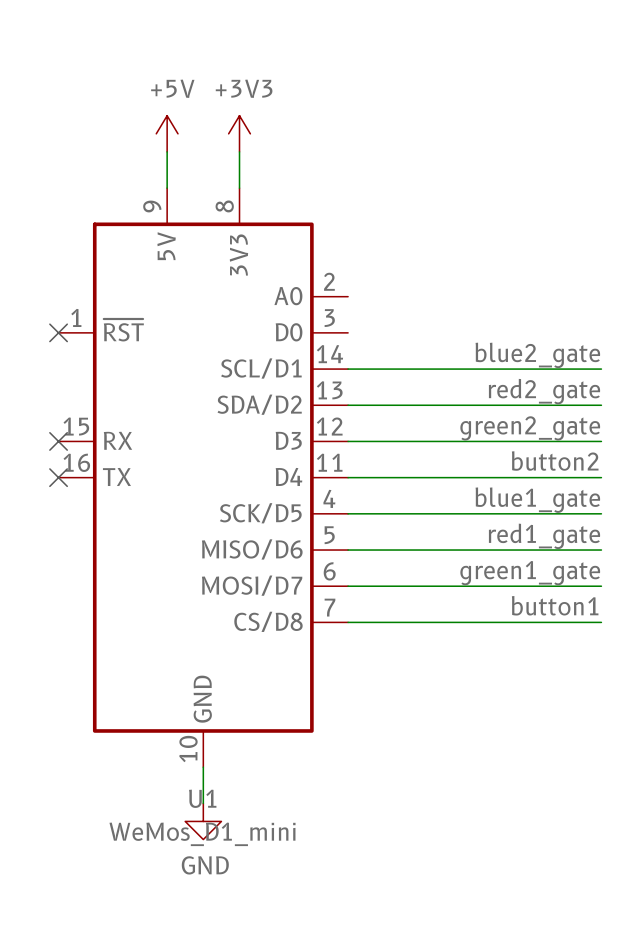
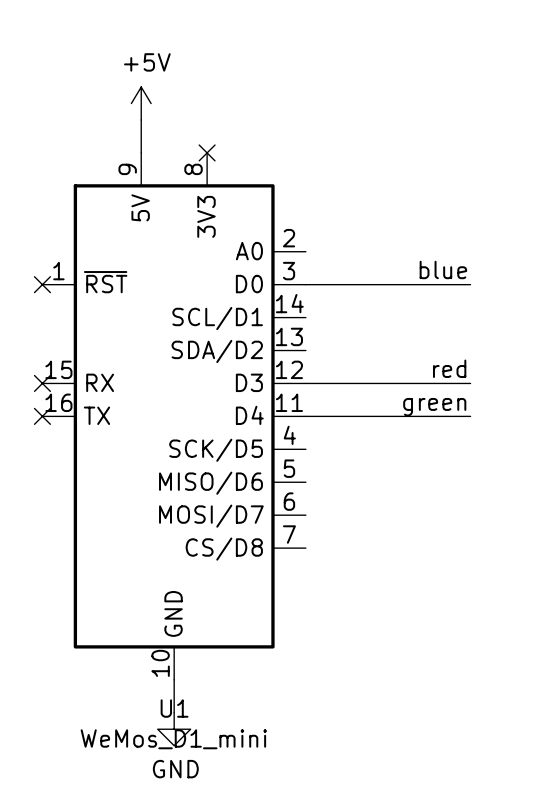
power symbol: +3V3 (239, 133) -> none
wire: (239, 151) (239, 188) -> none
no-connect mark: none -> (207, 152)
label: none -> blue (443, 269)
wire: none -> (305, 284) (470, 284)
label: blue2_gate (537, 355) -> none
wire: (348, 369) (601, 369) -> none
label: red2_gate (544, 391) -> none
wire: (348, 405) (601, 405) -> none
label: none -> red (449, 368)
label: green2_gate (530, 428) -> green (434, 407)
wire: (529, 441) (601, 441) -> none
label: button2 (555, 460) -> none
wire: (529, 477) (601, 477) -> none
label: blue1_gate (537, 500) -> none
wire: (348, 513) (601, 513) -> none
label: red1_gate (544, 536) -> none
wire: (348, 550) (601, 550) -> none
label: green1_gate (530, 573) -> none
wire: (348, 586) (601, 586) -> none
label: button1 (555, 605) -> none
wire: (348, 622) (601, 622) -> none

